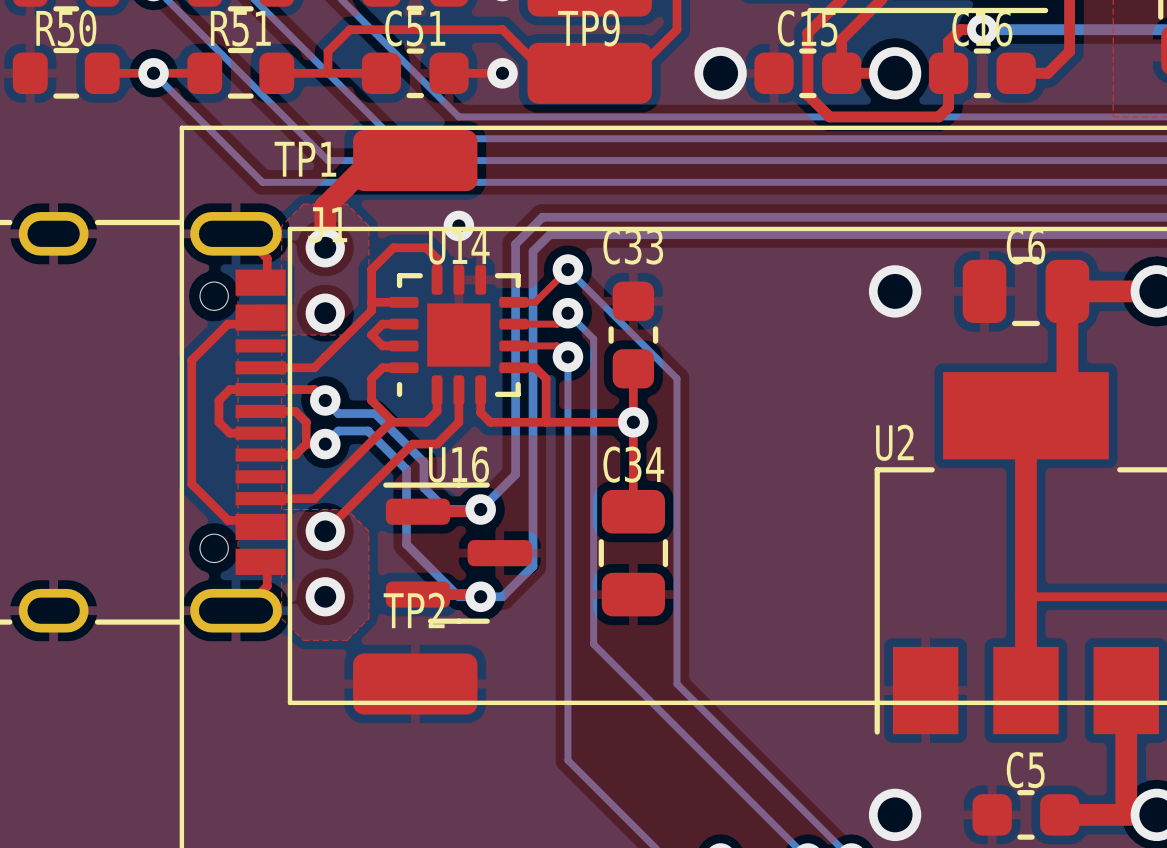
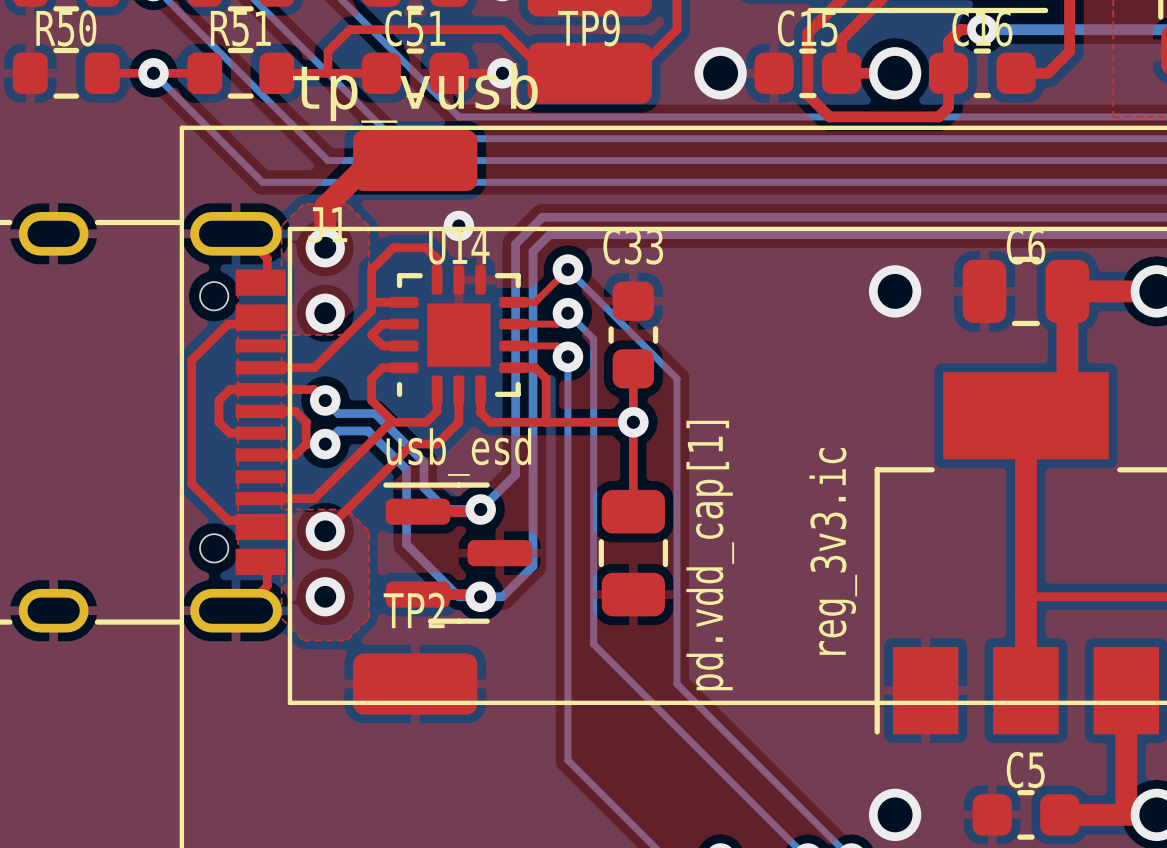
TP1 name: TP1 (305, 159) -> tp_vusb (415, 93)
U2 name: U2 (894, 442) -> reg_3v3.ic (833, 551)
U16 name: U16 (459, 464) -> usb_esd (458, 452)
C34 name: C34 (633, 464) -> pd.vdd_cap[1] (710, 555)

